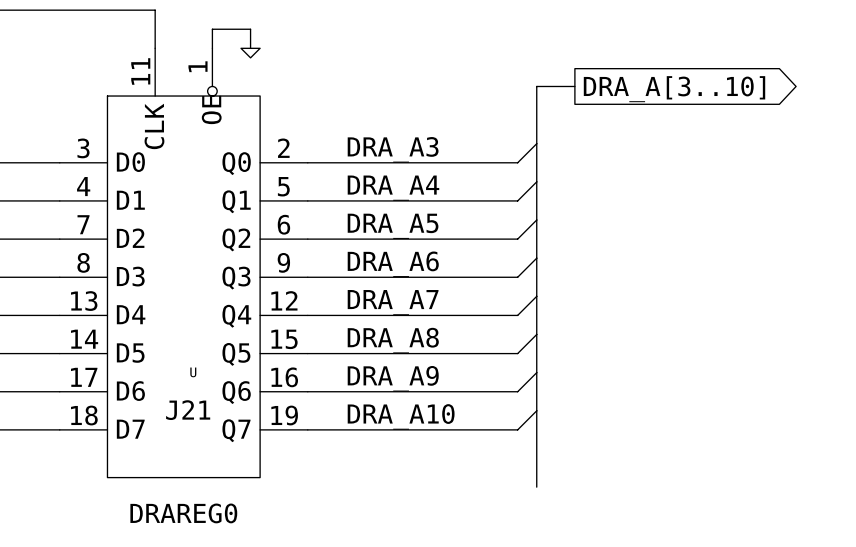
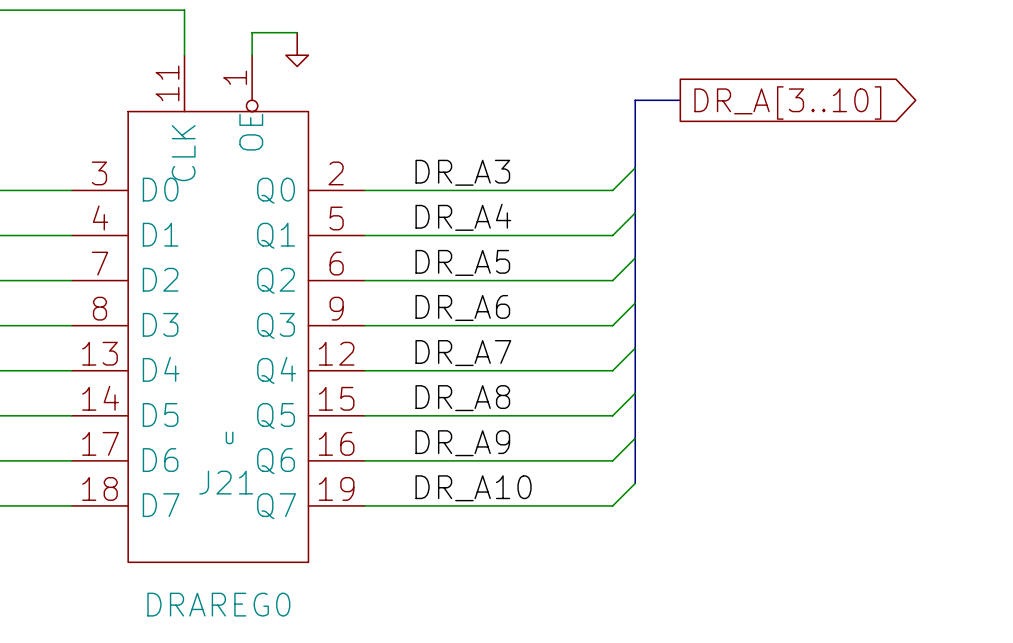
global label: DRA_A[3..10] (674, 89) -> DR_A[3..10] (787, 102)
label: DRA_A3 (393, 149) -> DR_A3 (462, 172)
label: DRA_A4 (393, 188) -> DR_A4 (463, 217)
label: DRA_A5 (393, 226) -> DR_A5 (462, 262)
label: DRA_A6 (393, 264) -> DR_A6 (462, 307)
label: DRA_A7 (393, 302) -> DR_A7 (463, 353)
label: DRA_A8 (393, 340) -> DR_A8 (462, 398)
label: DRA_A9 (393, 378) -> DR_A9 (462, 443)
bus: (536, 410) (536, 487) -> none
label: DRA_A10 (401, 416) -> DR_A10 (473, 488)

